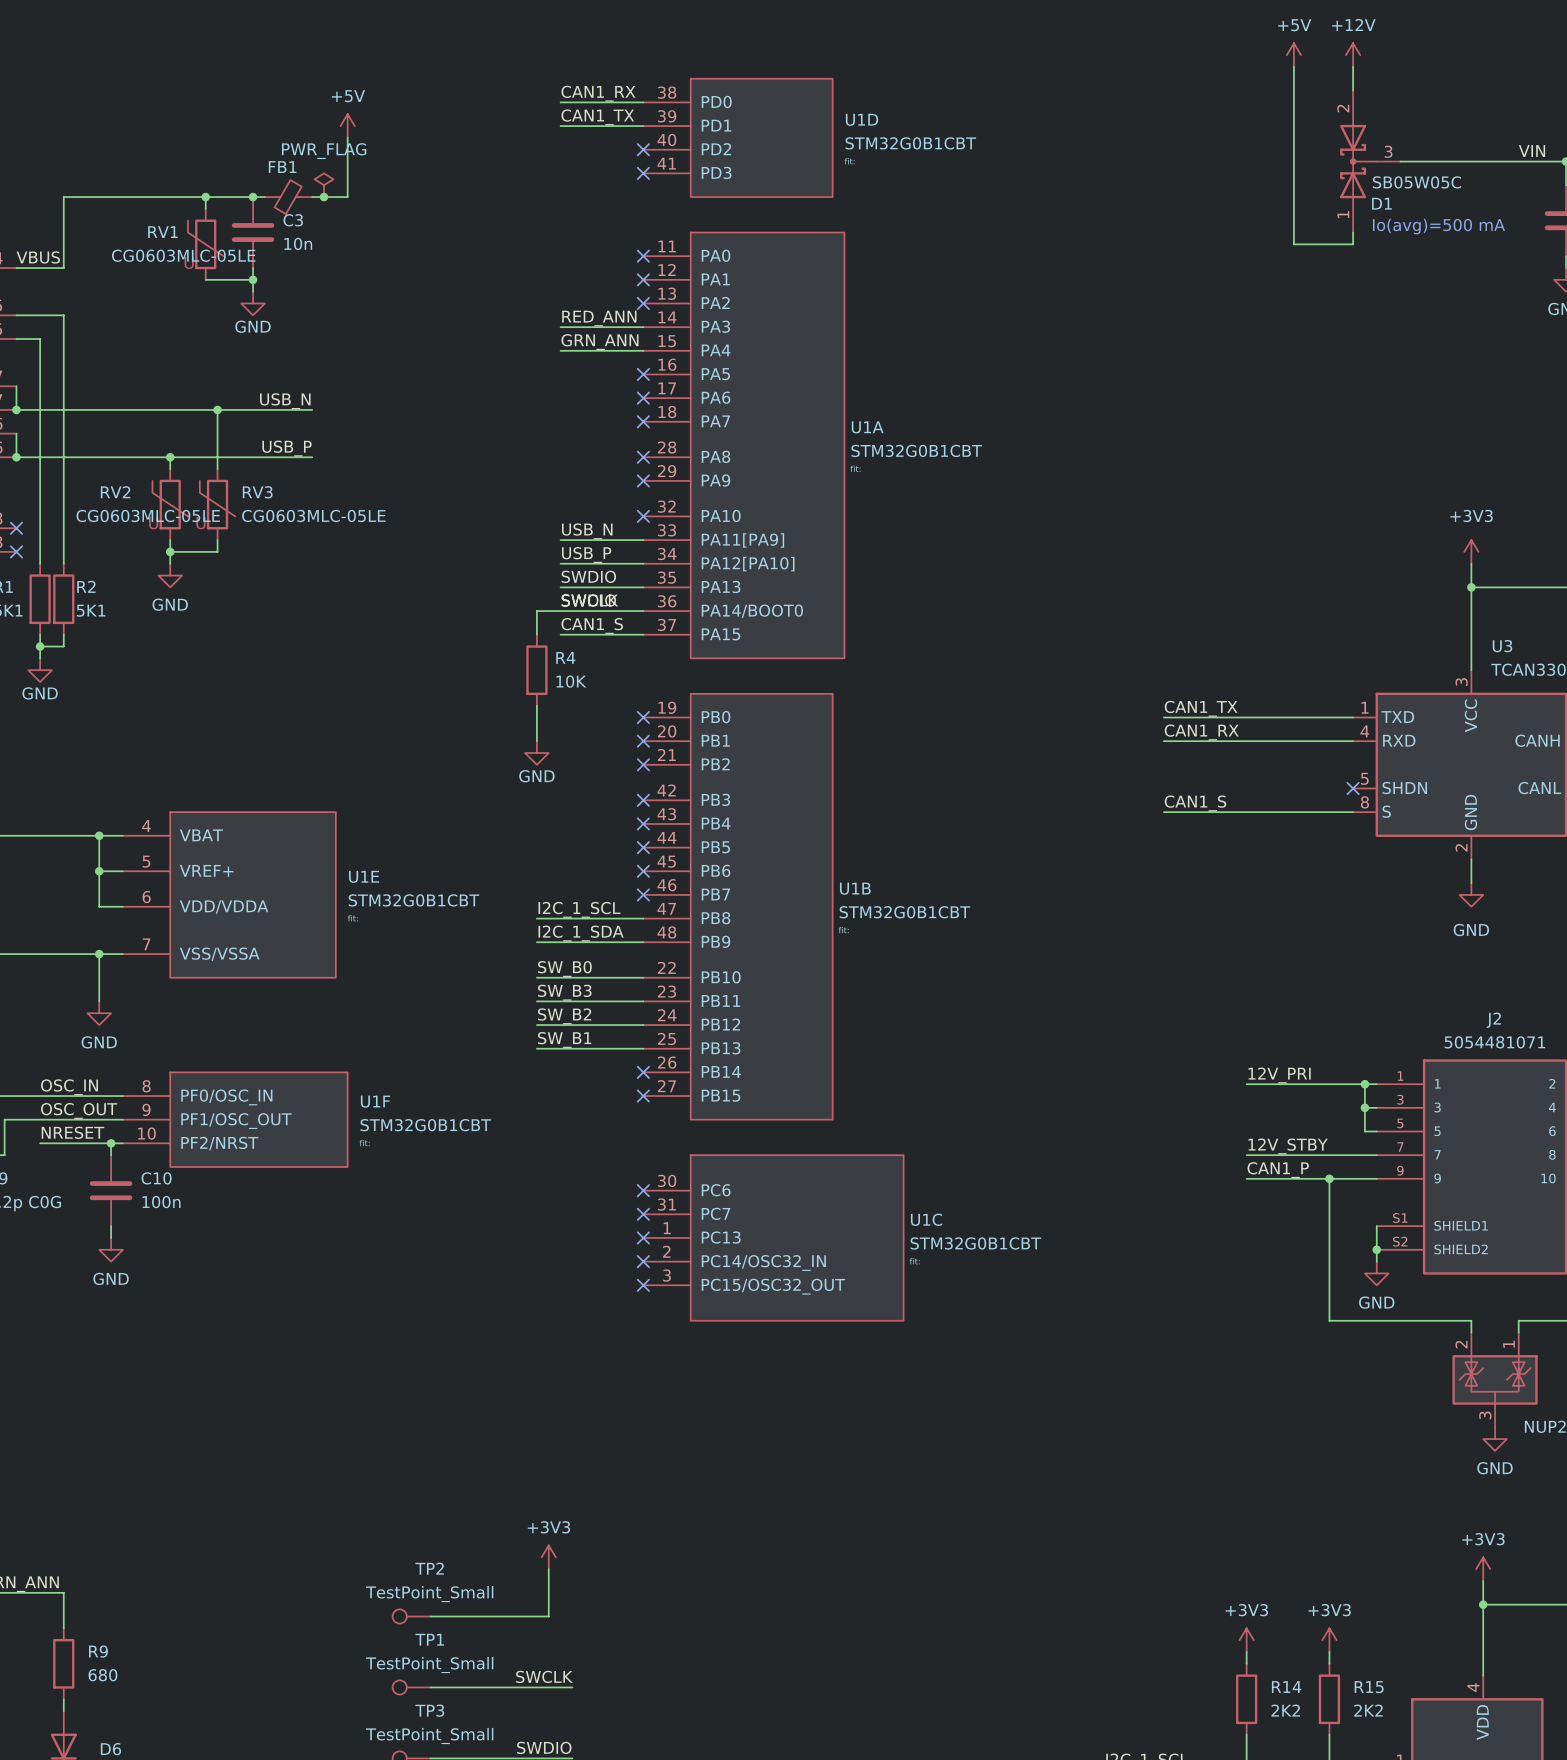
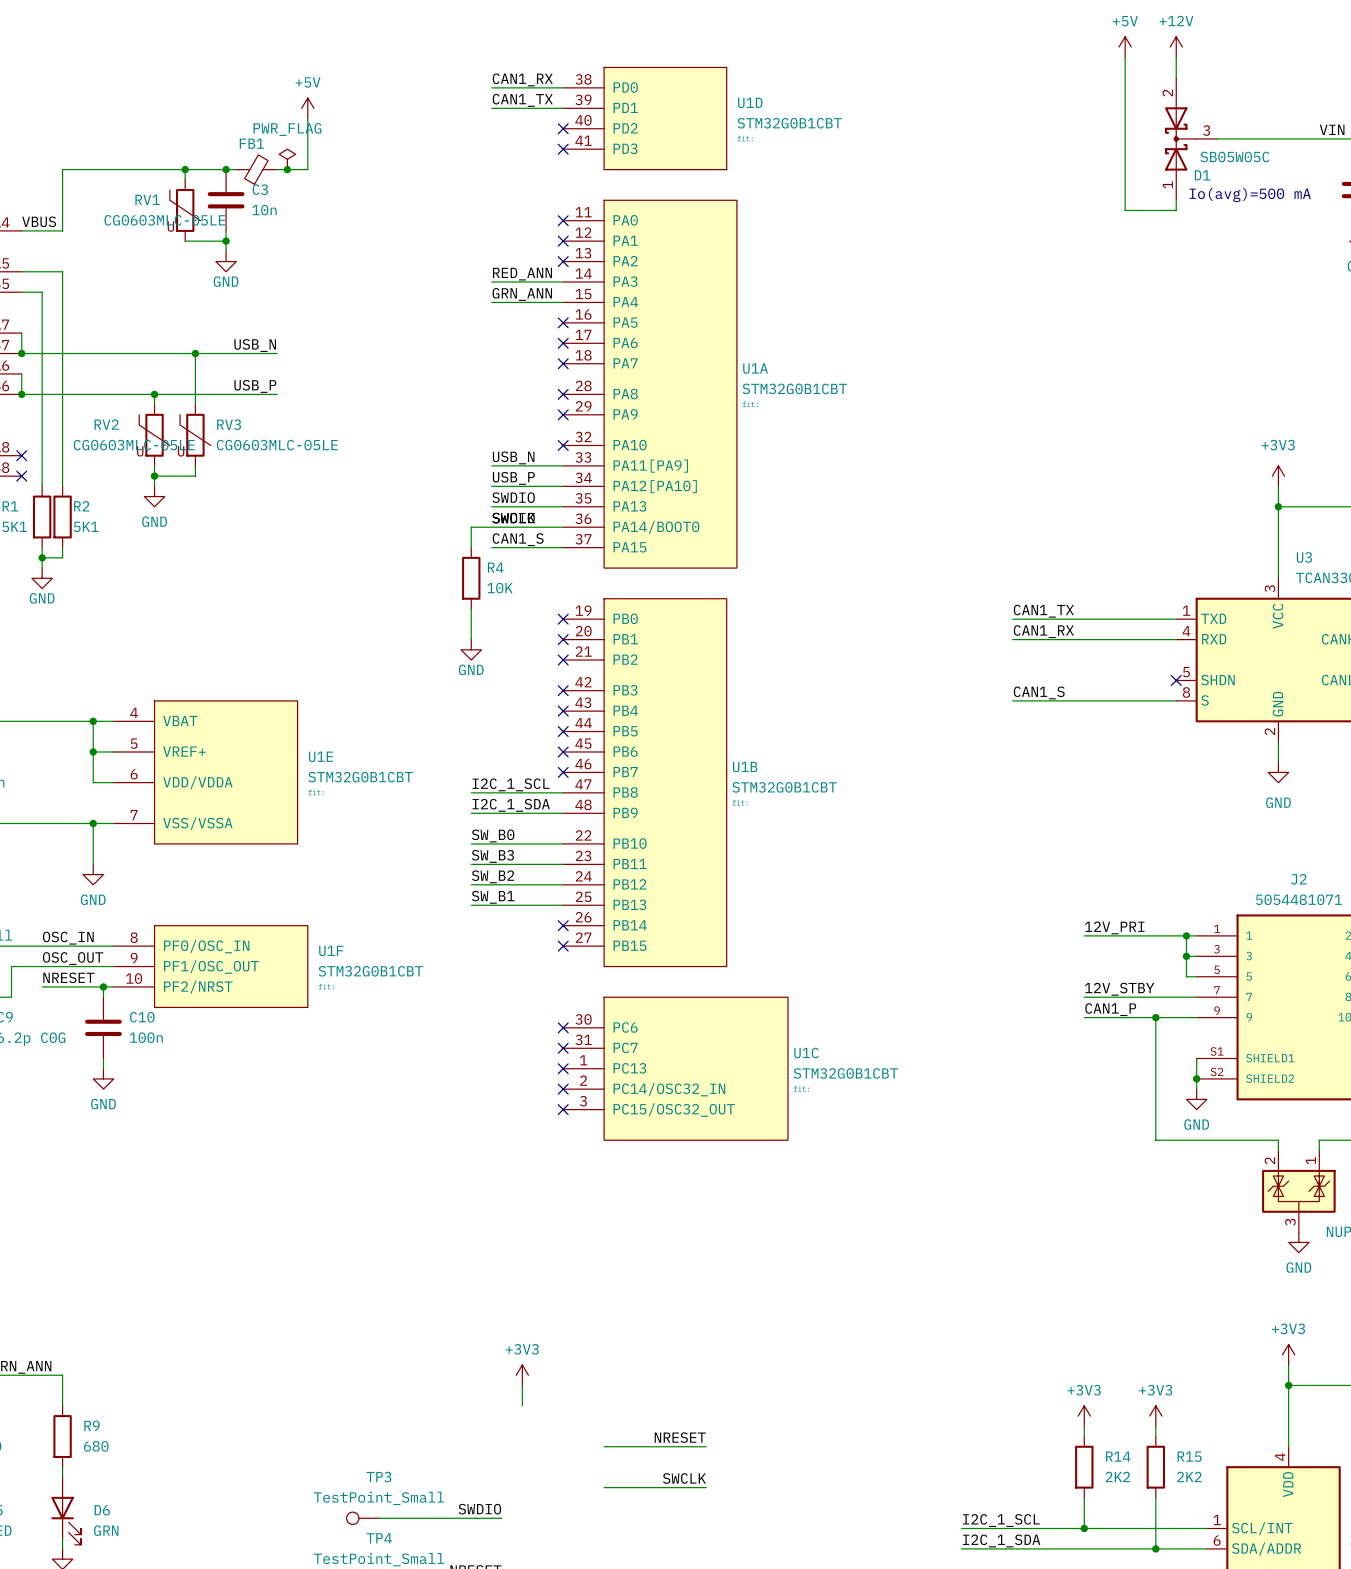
power symbol position: +3V3 (548, 1557) -> +3V3 (522, 1375)
wire: (548, 1569) (548, 1616) (430, 1616) -> none
wire: none -> (522, 1385) (522, 1405)
TP2: TestPoint_Small (411, 1616) -> none
label: none -> NRESET (680, 1437)
wire: none -> (604, 1446) (706, 1446)
label: SWCLK (544, 1676) -> none
TP1: TestPoint_Small (411, 1687) -> none
wire: (430, 1687) (572, 1687) -> none
label: none -> SWCLK (684, 1478)
wire: none -> (604, 1487) (706, 1487)

